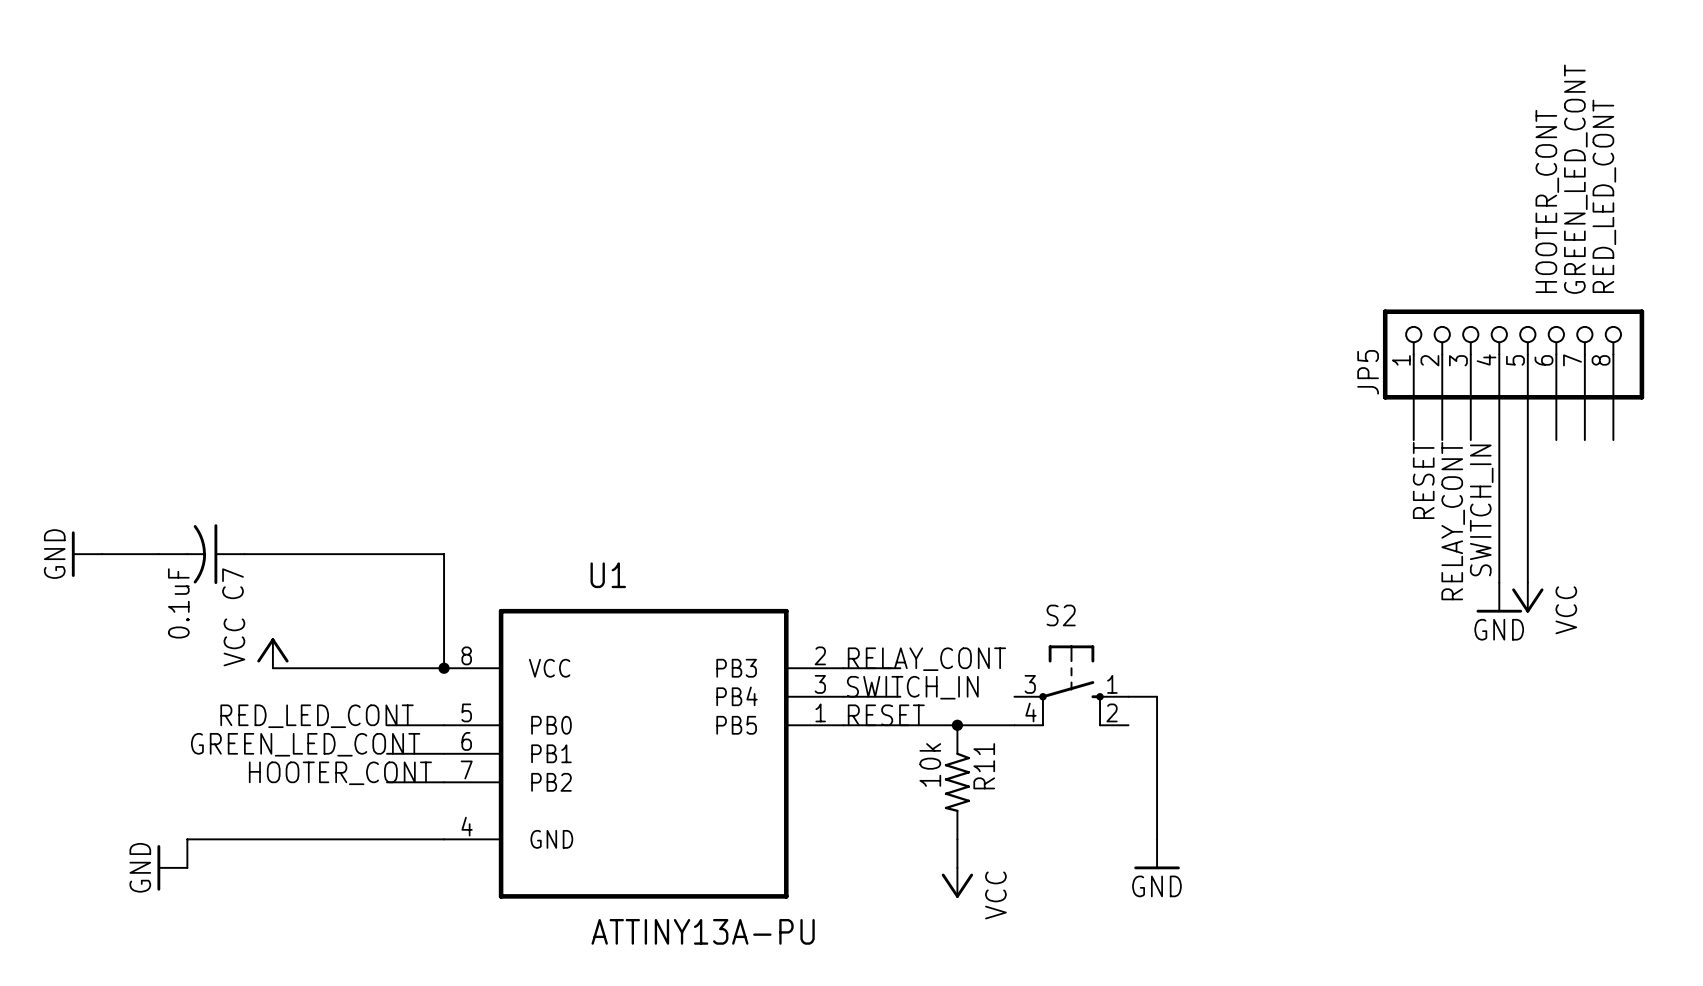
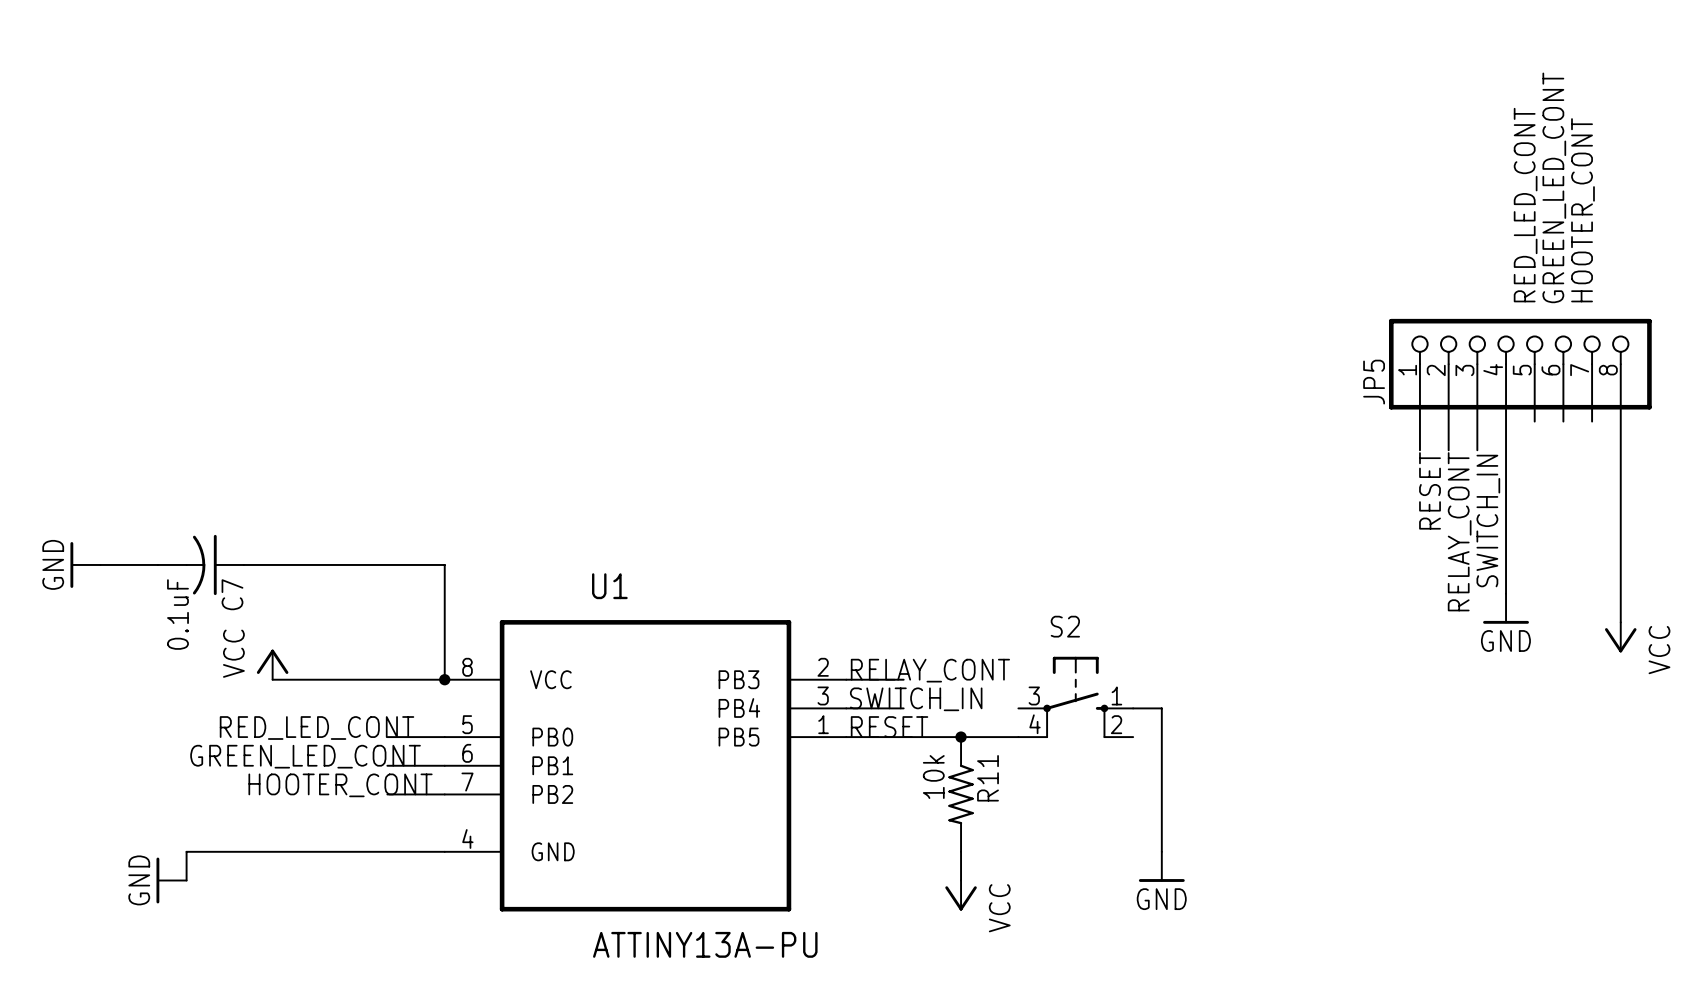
label: GREEN_LED_CONT (1575, 179) -> HOOTER_CONT (1582, 210)
label position: RED_LED_CONT (1604, 196) -> RED_LED_CONT (1525, 205)
label: HOOTER_CONT (1547, 201) -> GREEN_LED_CONT (1554, 187)
wire: (1527, 411) (1527, 582) -> (1620, 450) (1620, 622)
wire: (1556, 411) (1556, 440) -> none
wire: (1584, 411) (1584, 440) -> none
power symbol position: VCC (1527, 597) -> VCC (1620, 637)

